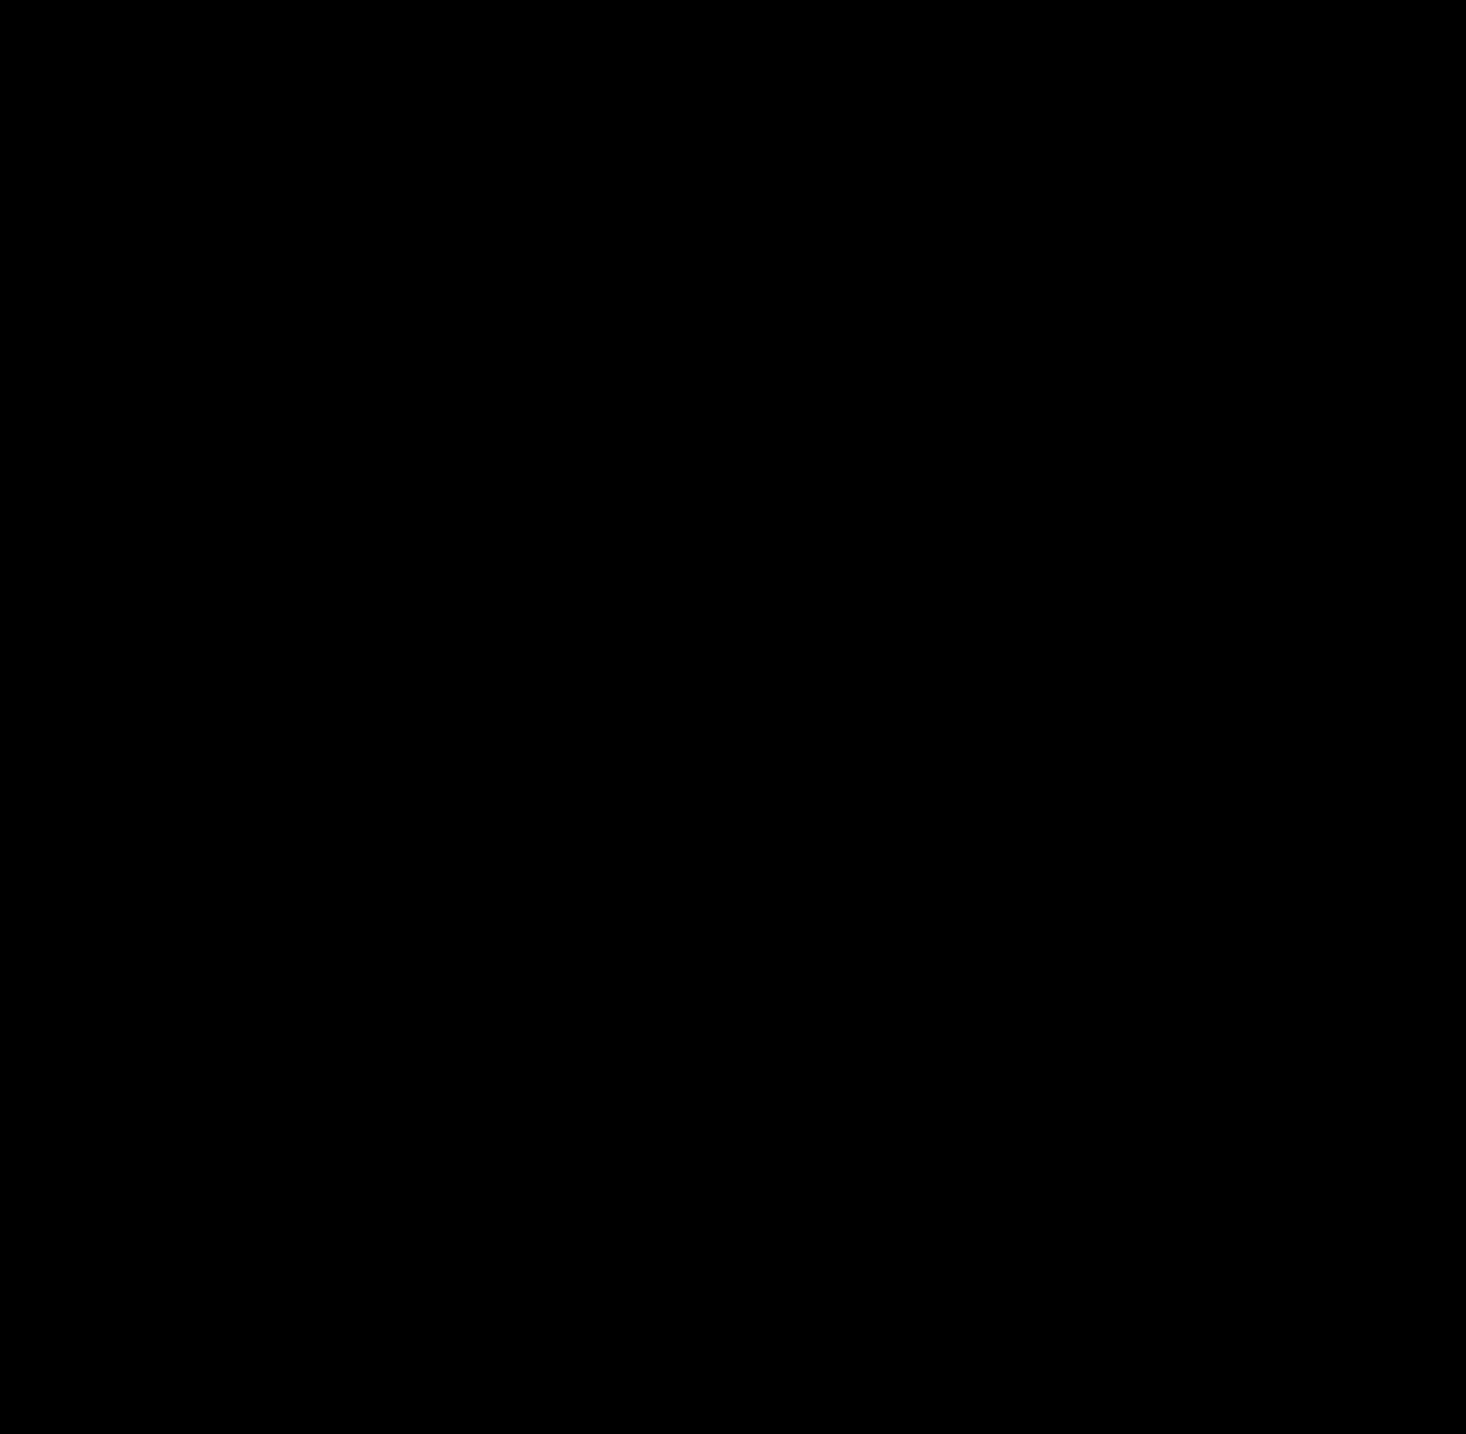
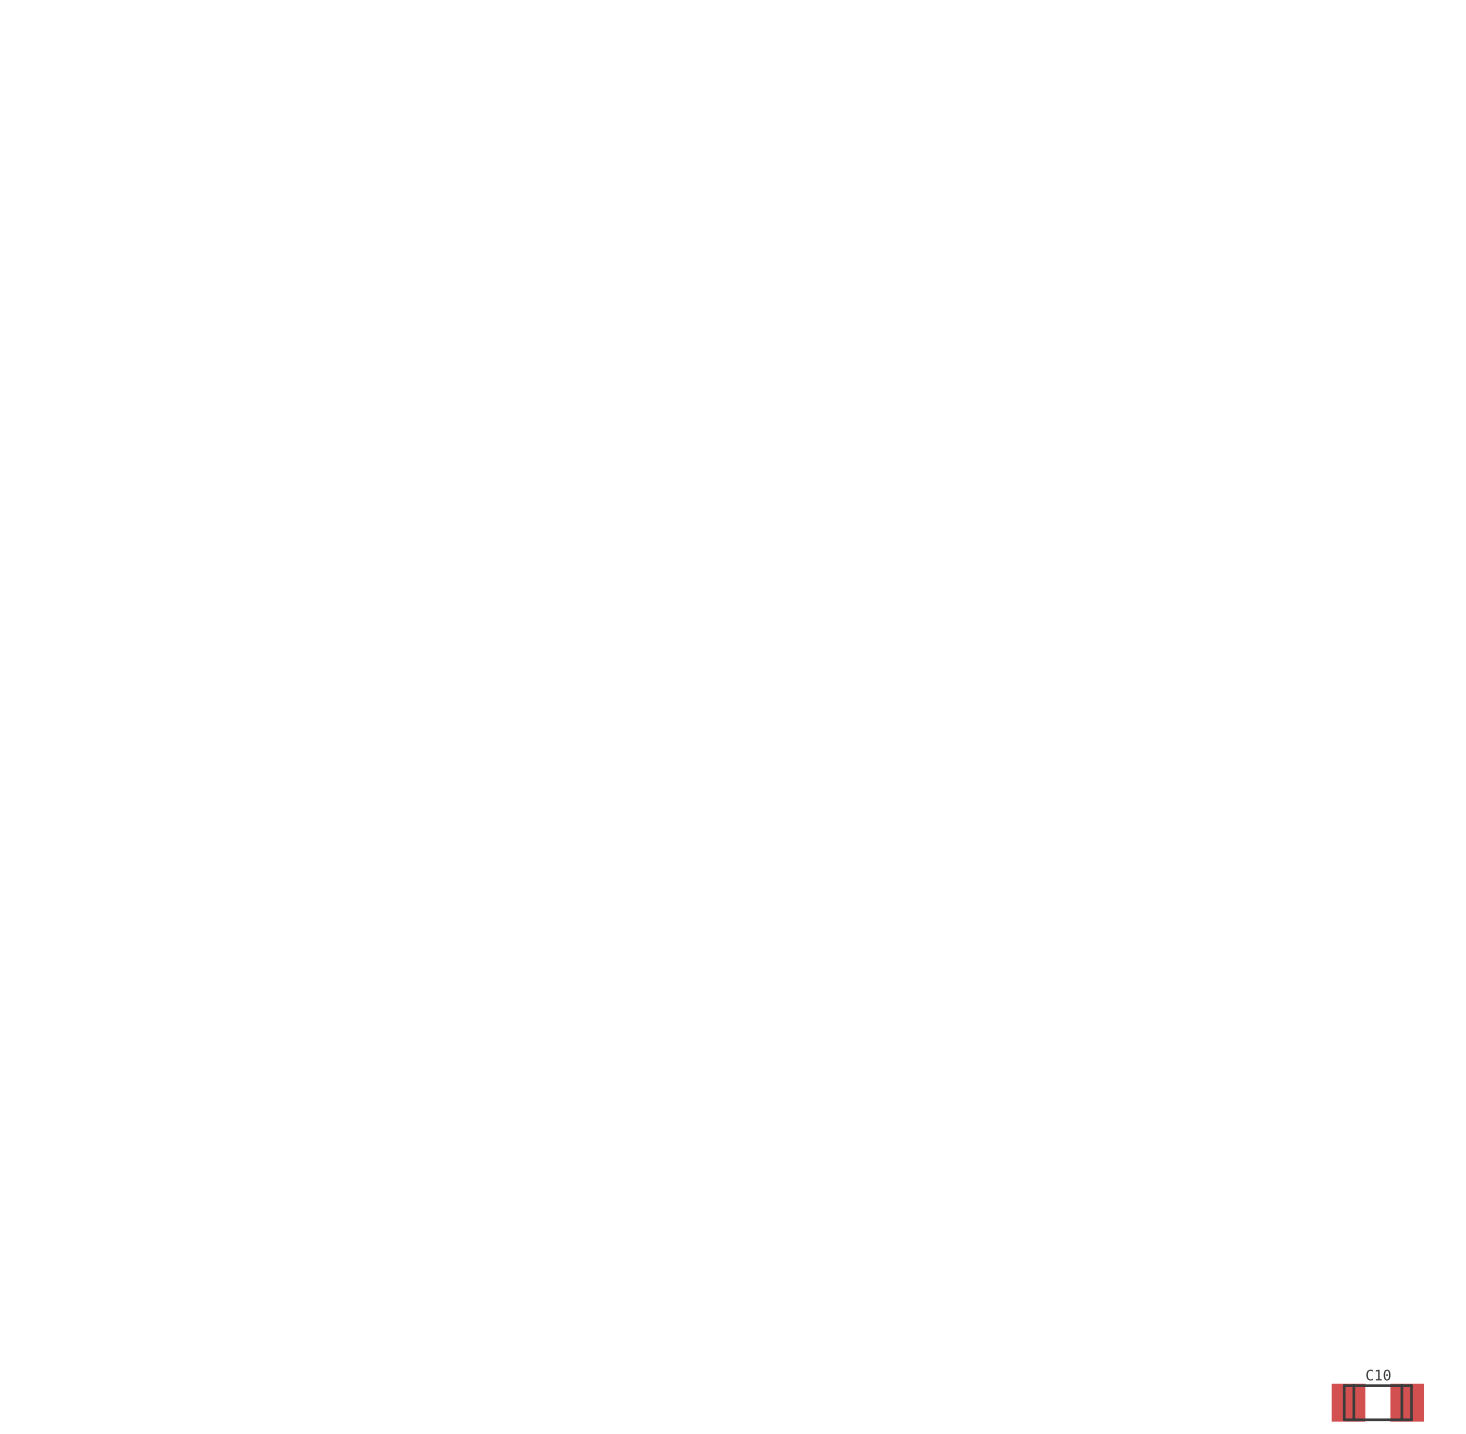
C10: none -> (1377, 1402)

